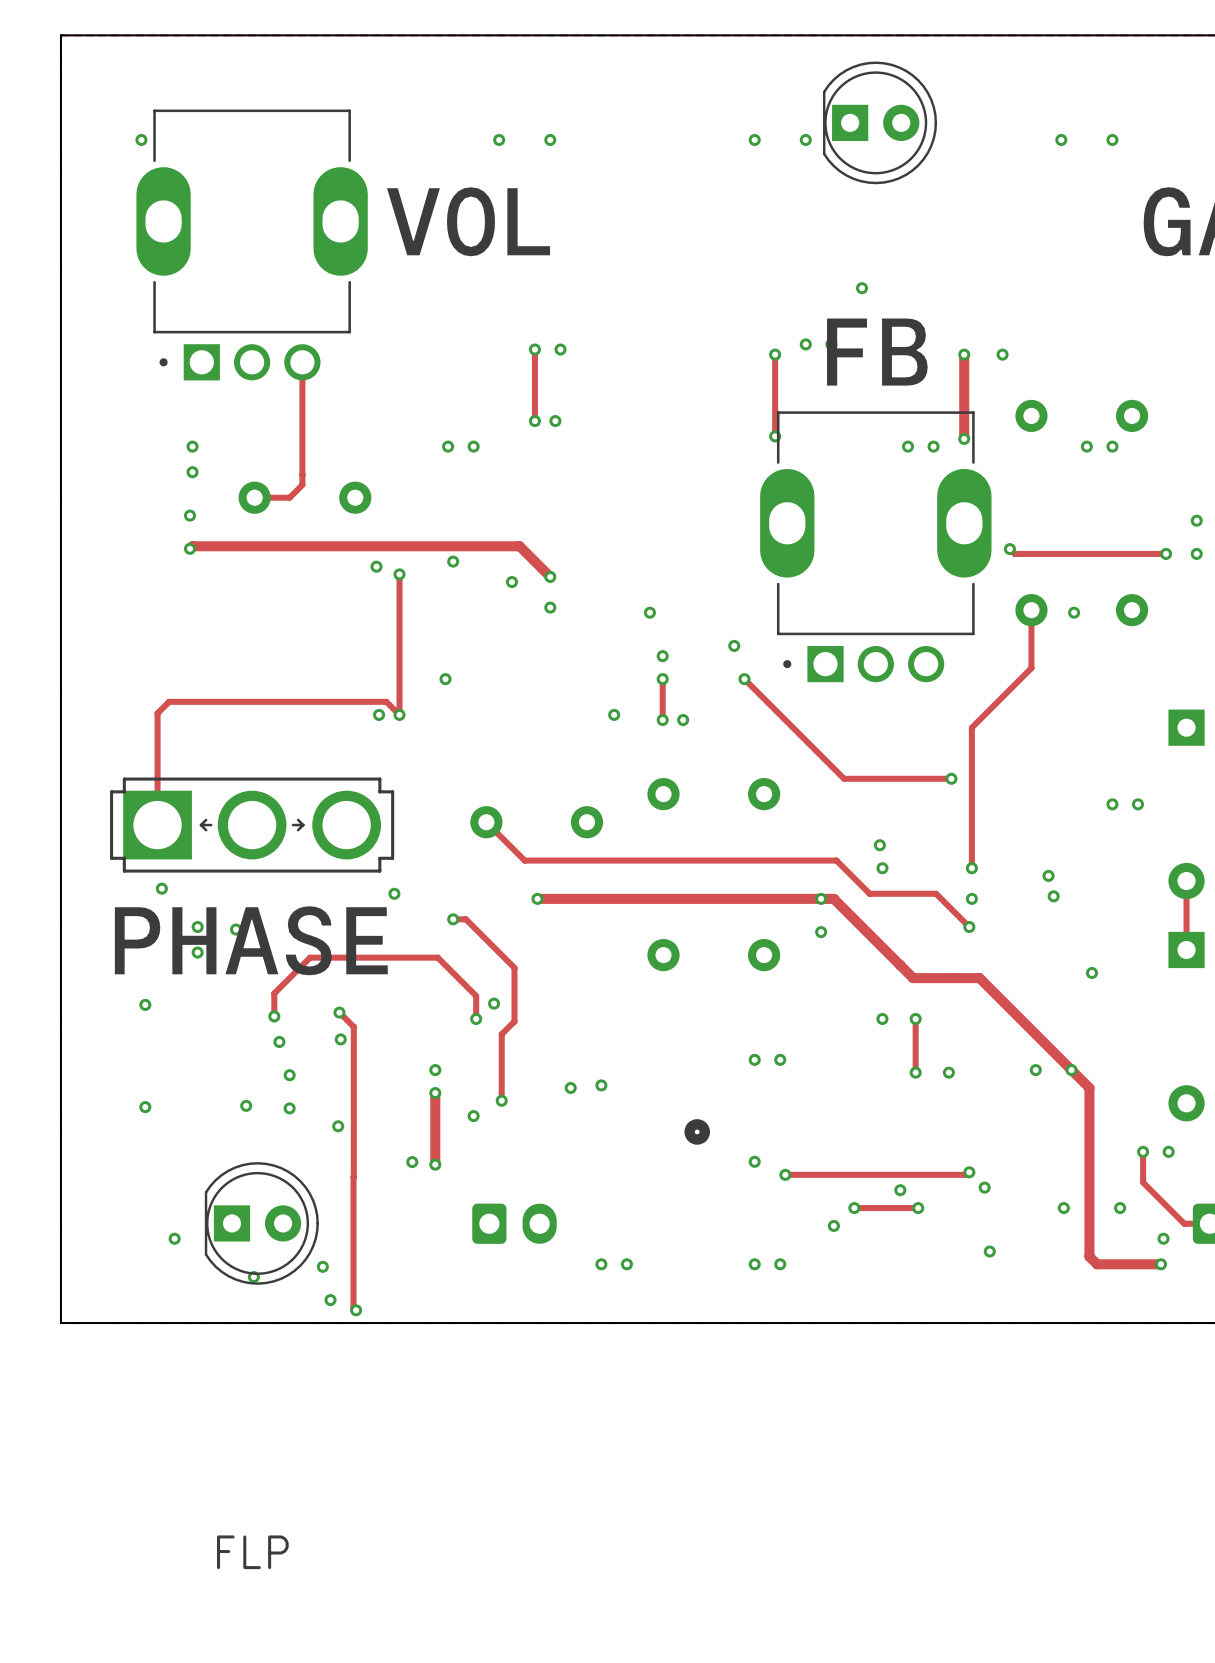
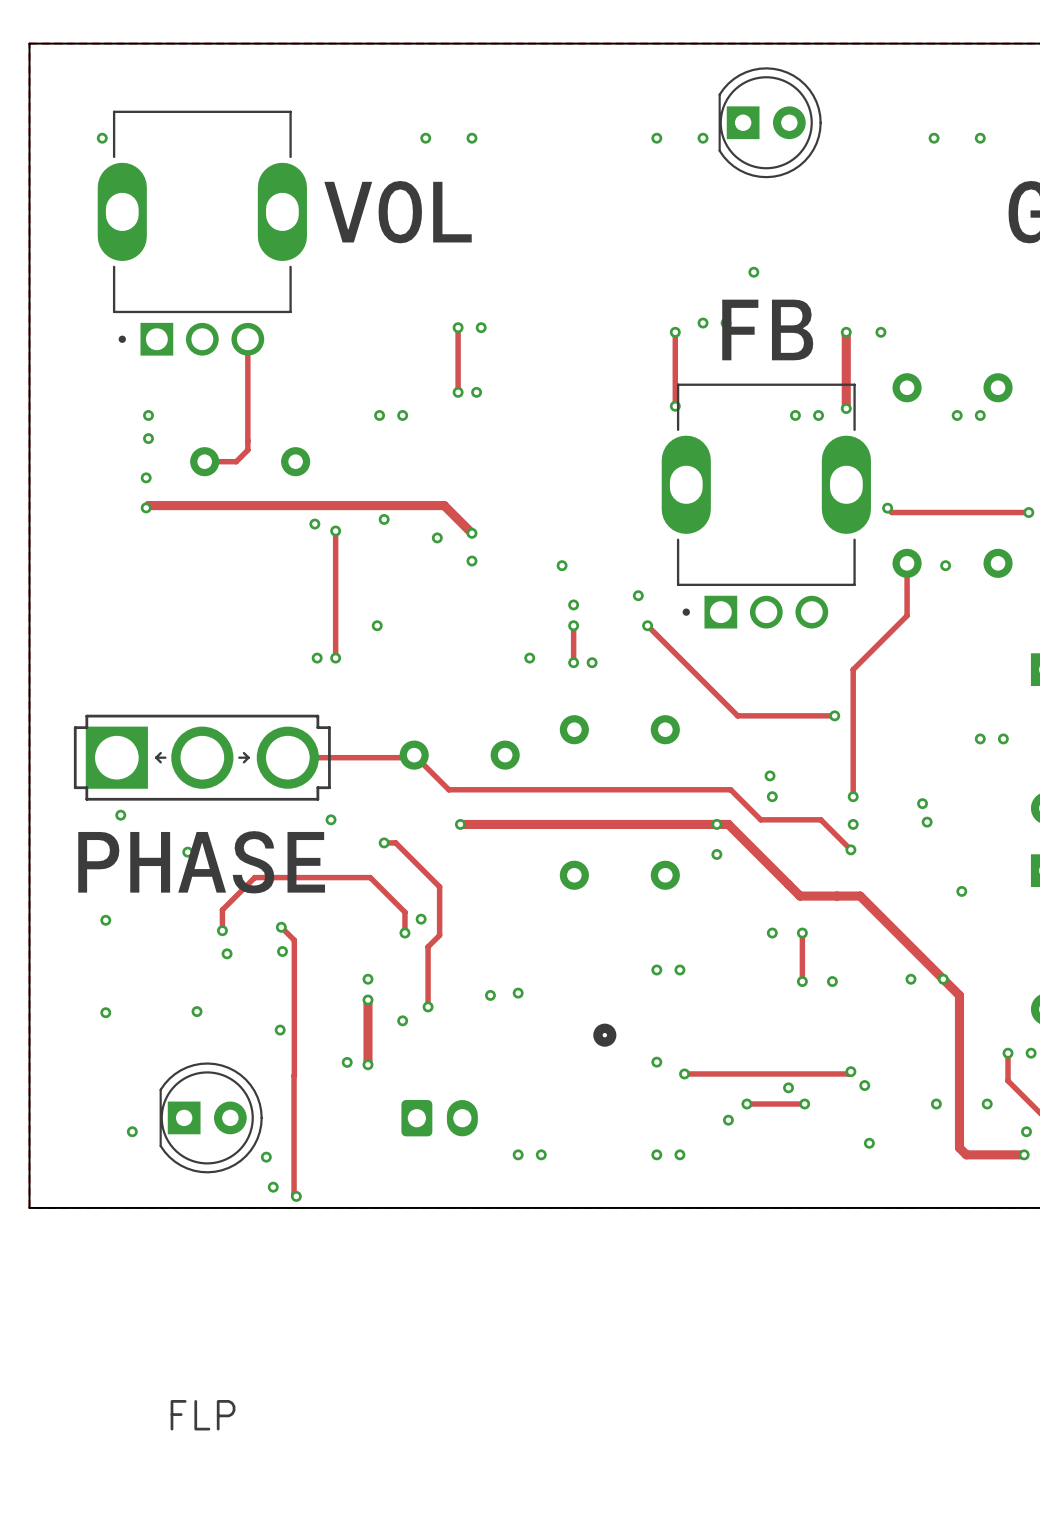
track: (399, 714) (386, 701) (169, 701) (157, 713) (157, 825) -> none
track: none -> (414, 755) (411, 757) (287, 757)
via: (197, 926) -> none
via: (197, 952) -> none
via: (289, 1075) -> none
via: (289, 1108) -> none
via: (253, 1277) -> none

